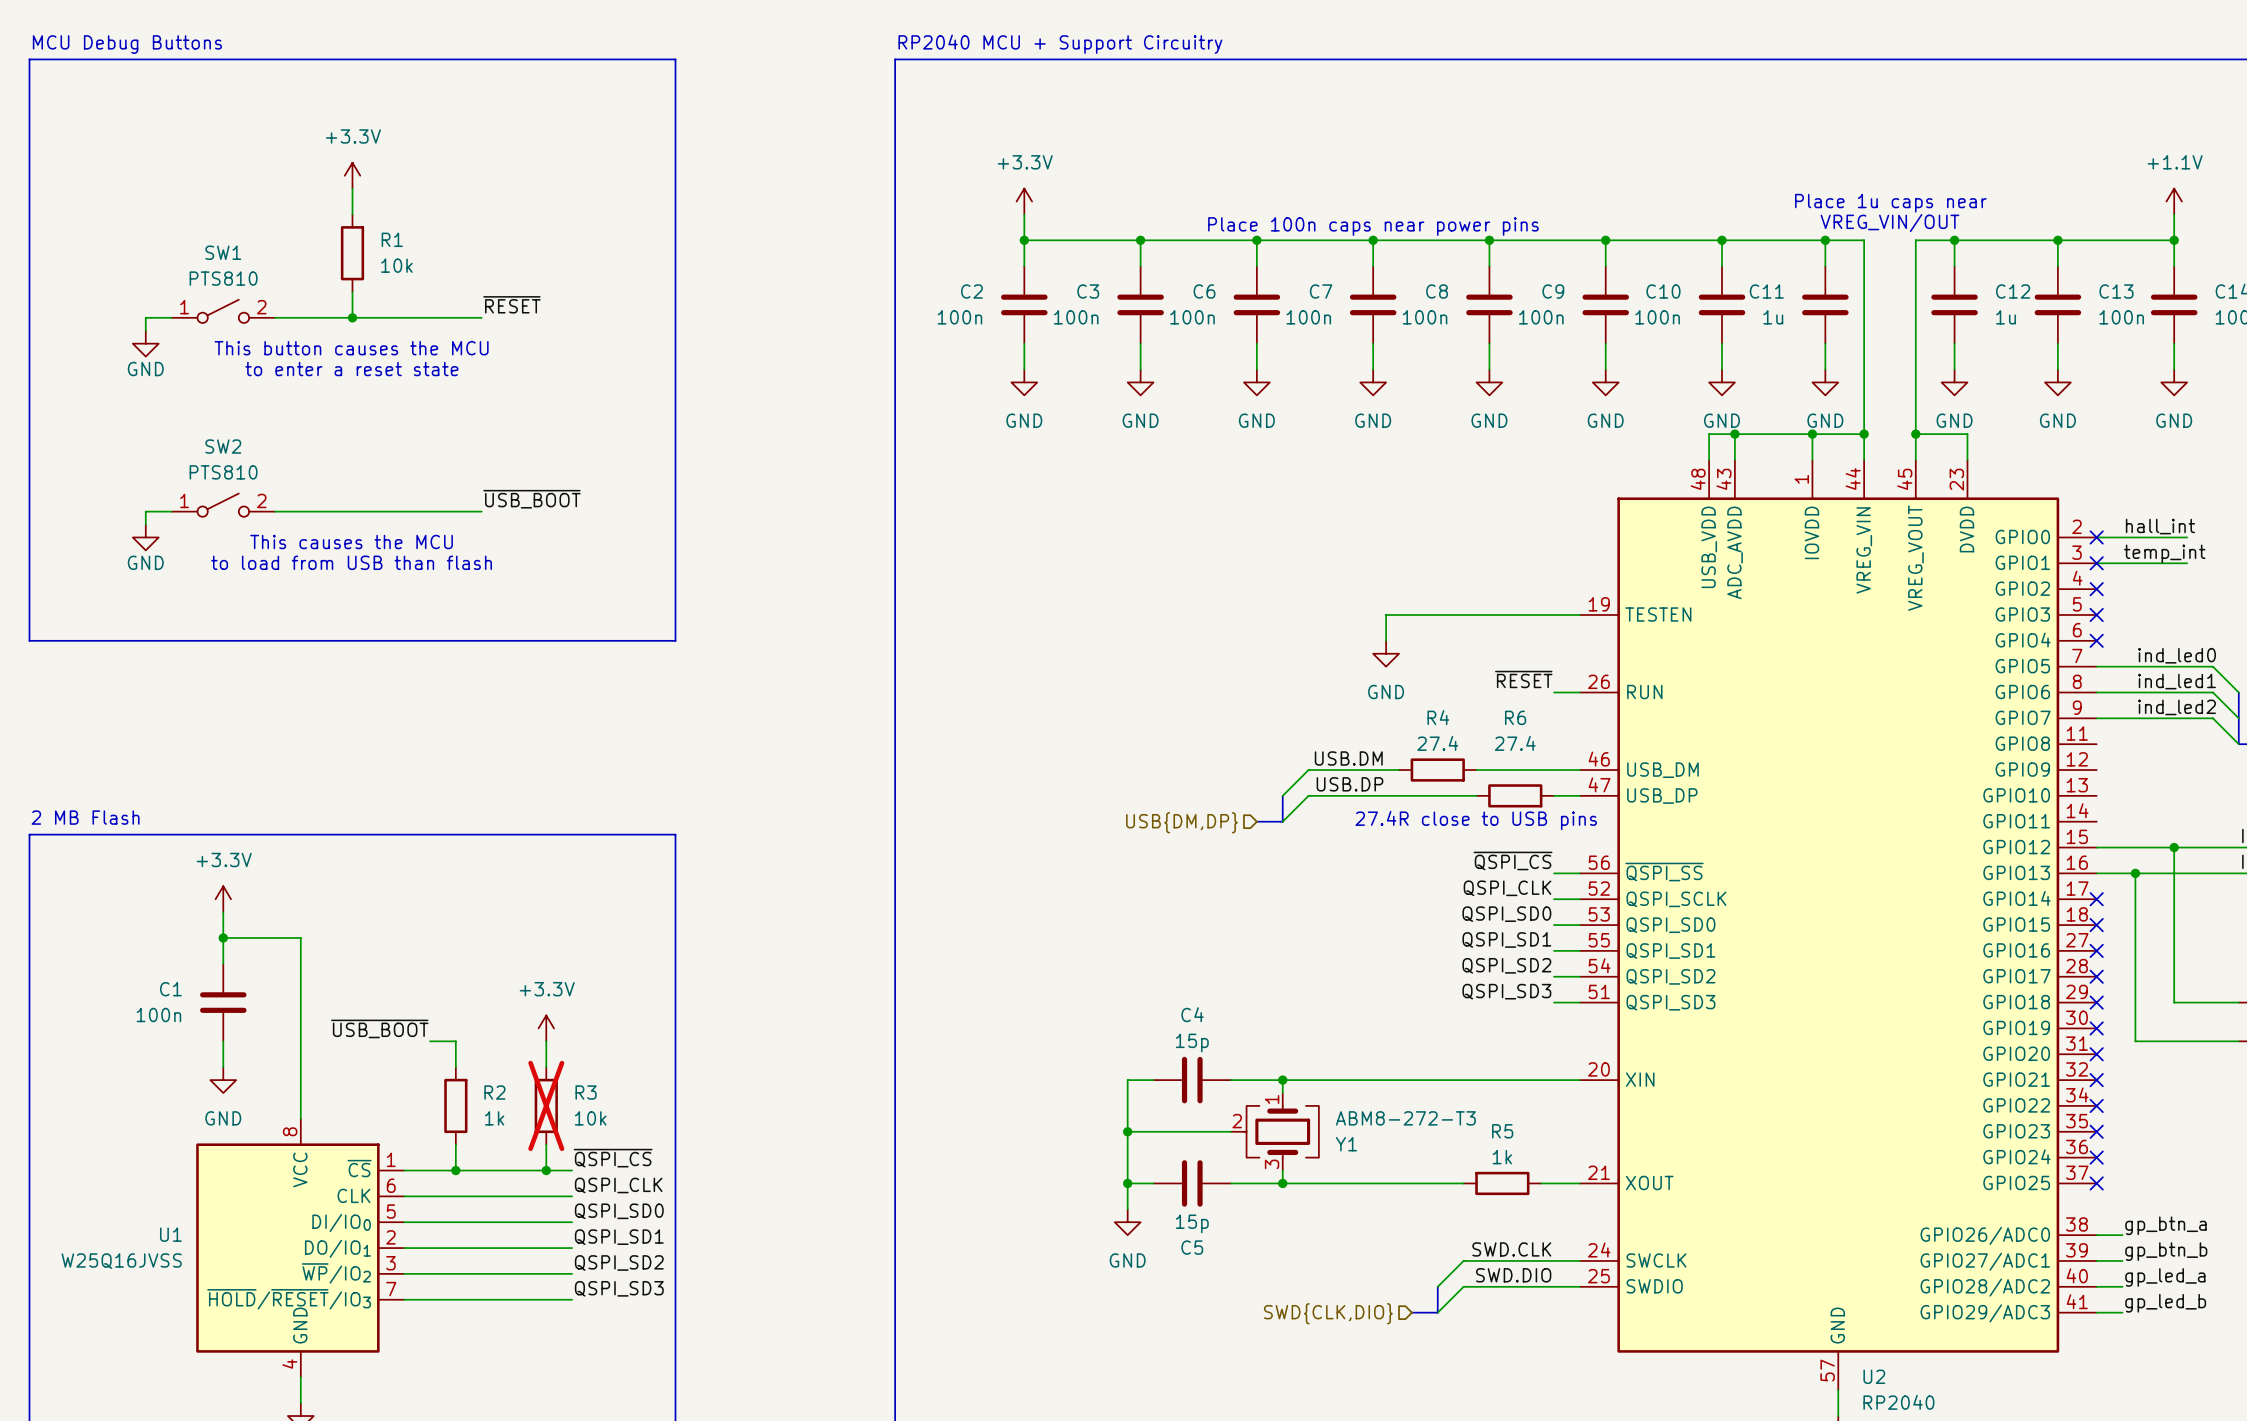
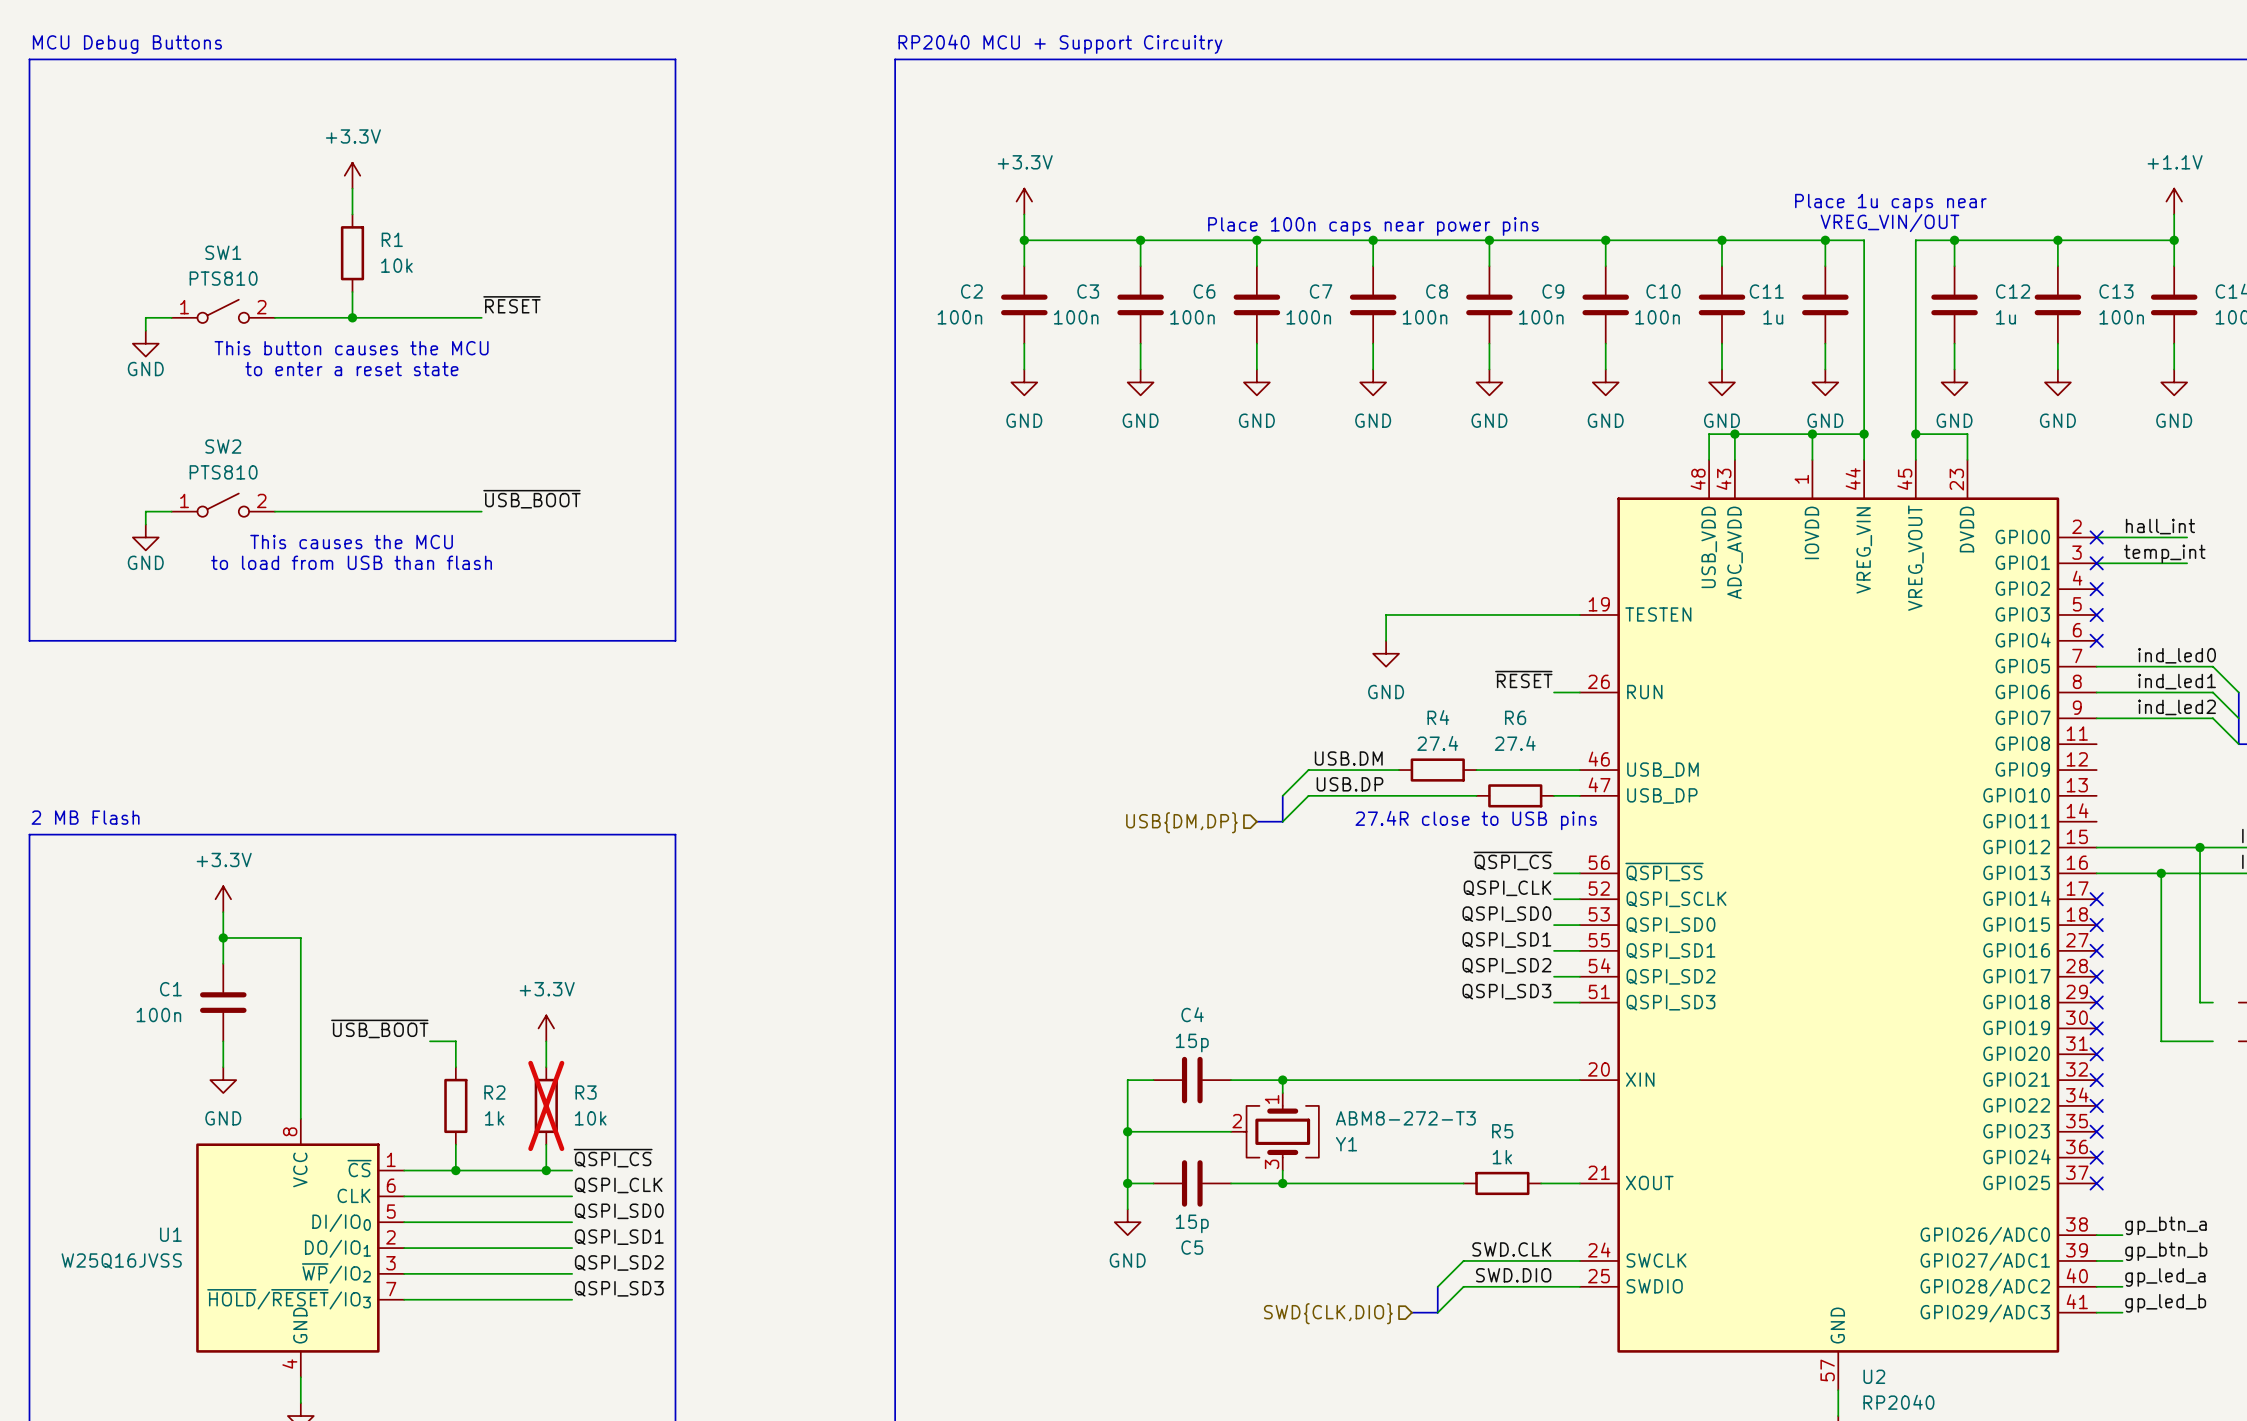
wire: (2174, 847) (2174, 1002) (2200, 1002) -> (2200, 847) (2200, 1002)
junction: (2174, 847) -> none
junction: none -> (2200, 847)
wire: (2135, 873) (2135, 1041) (2161, 1041) -> (2161, 873) (2161, 1041)
junction: (2135, 873) -> none
junction: none -> (2161, 873)
wire: (2212, 1002) (2238, 1002) -> none
wire: (2212, 1041) (2238, 1041) -> none

